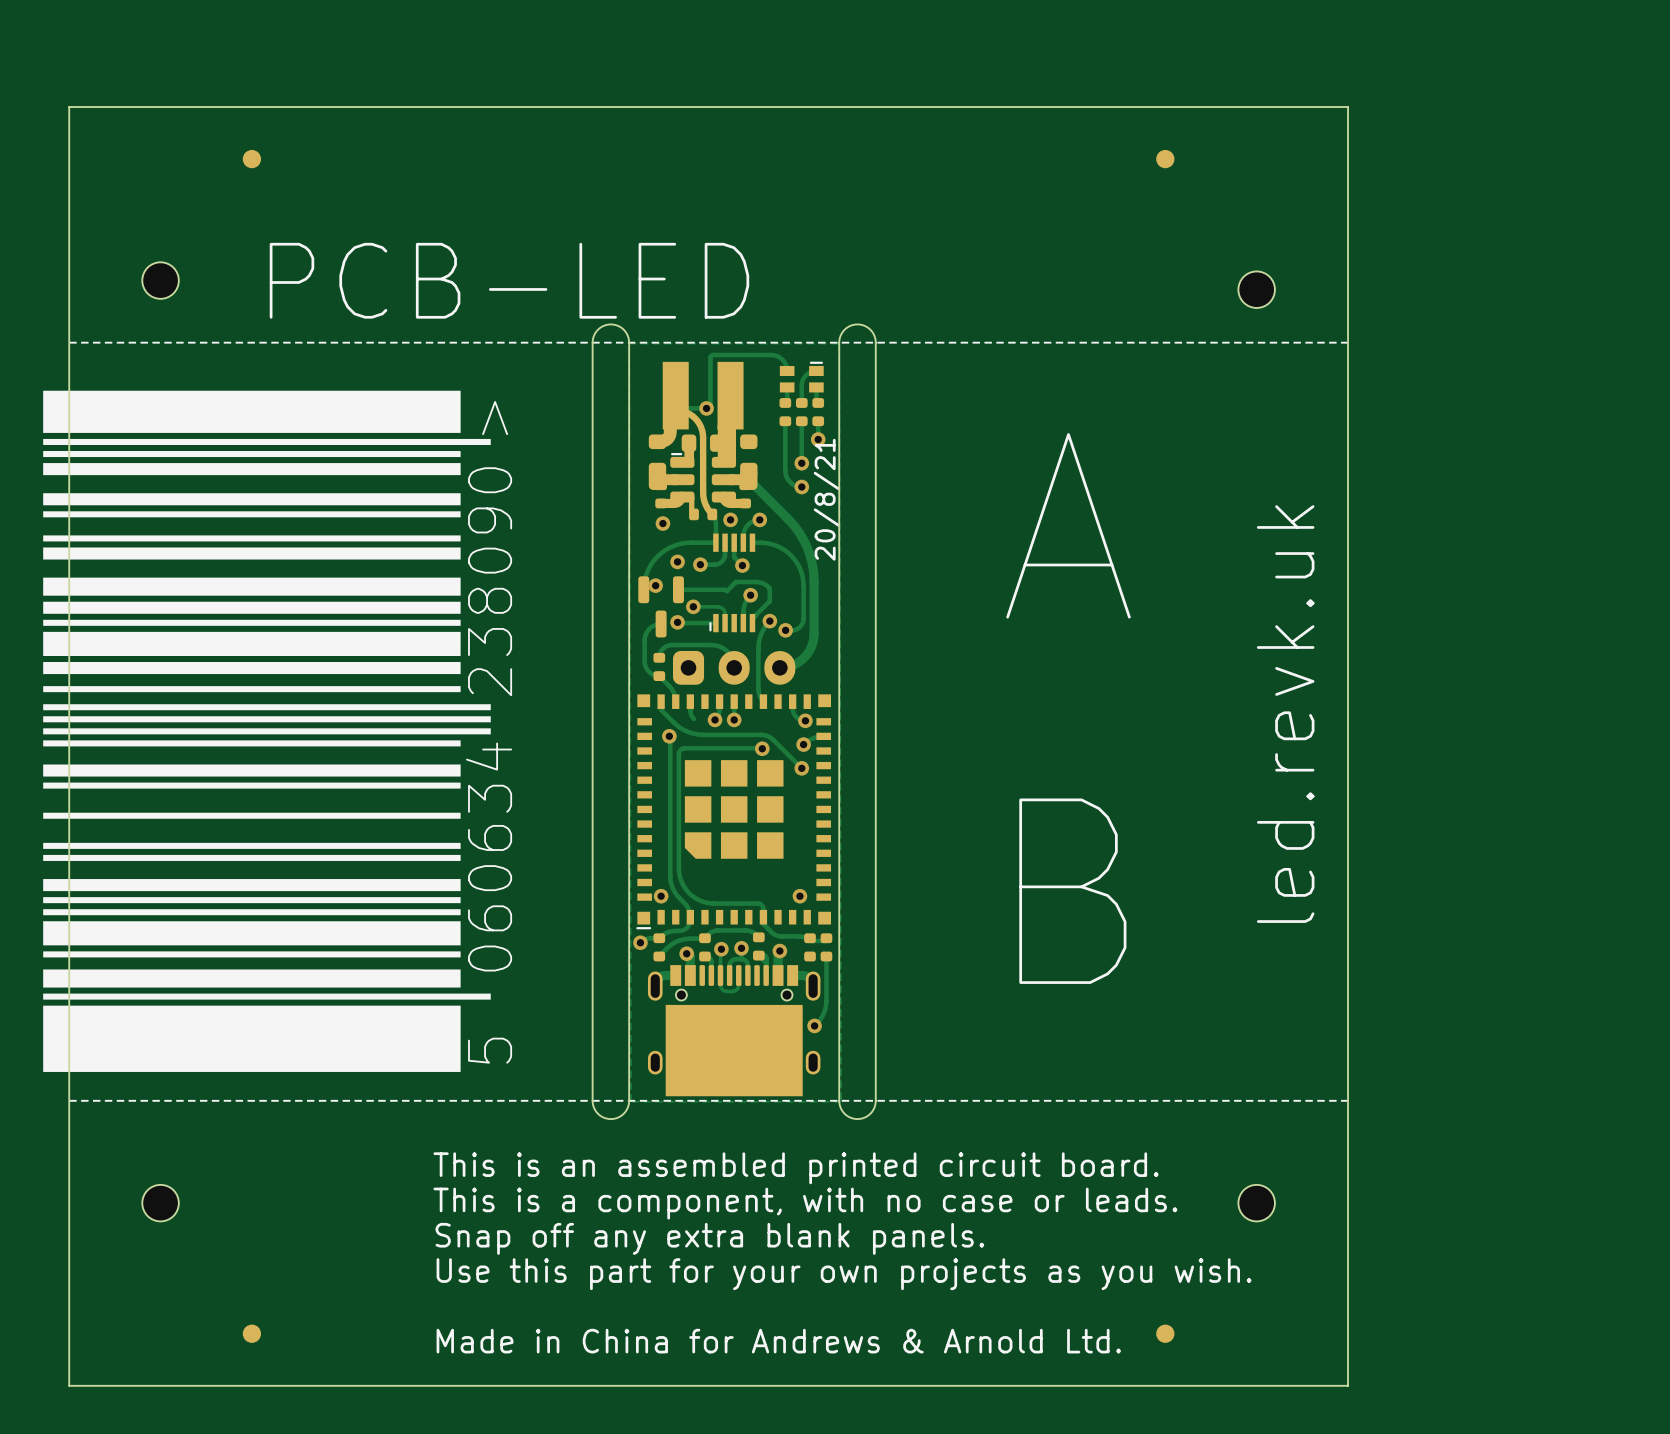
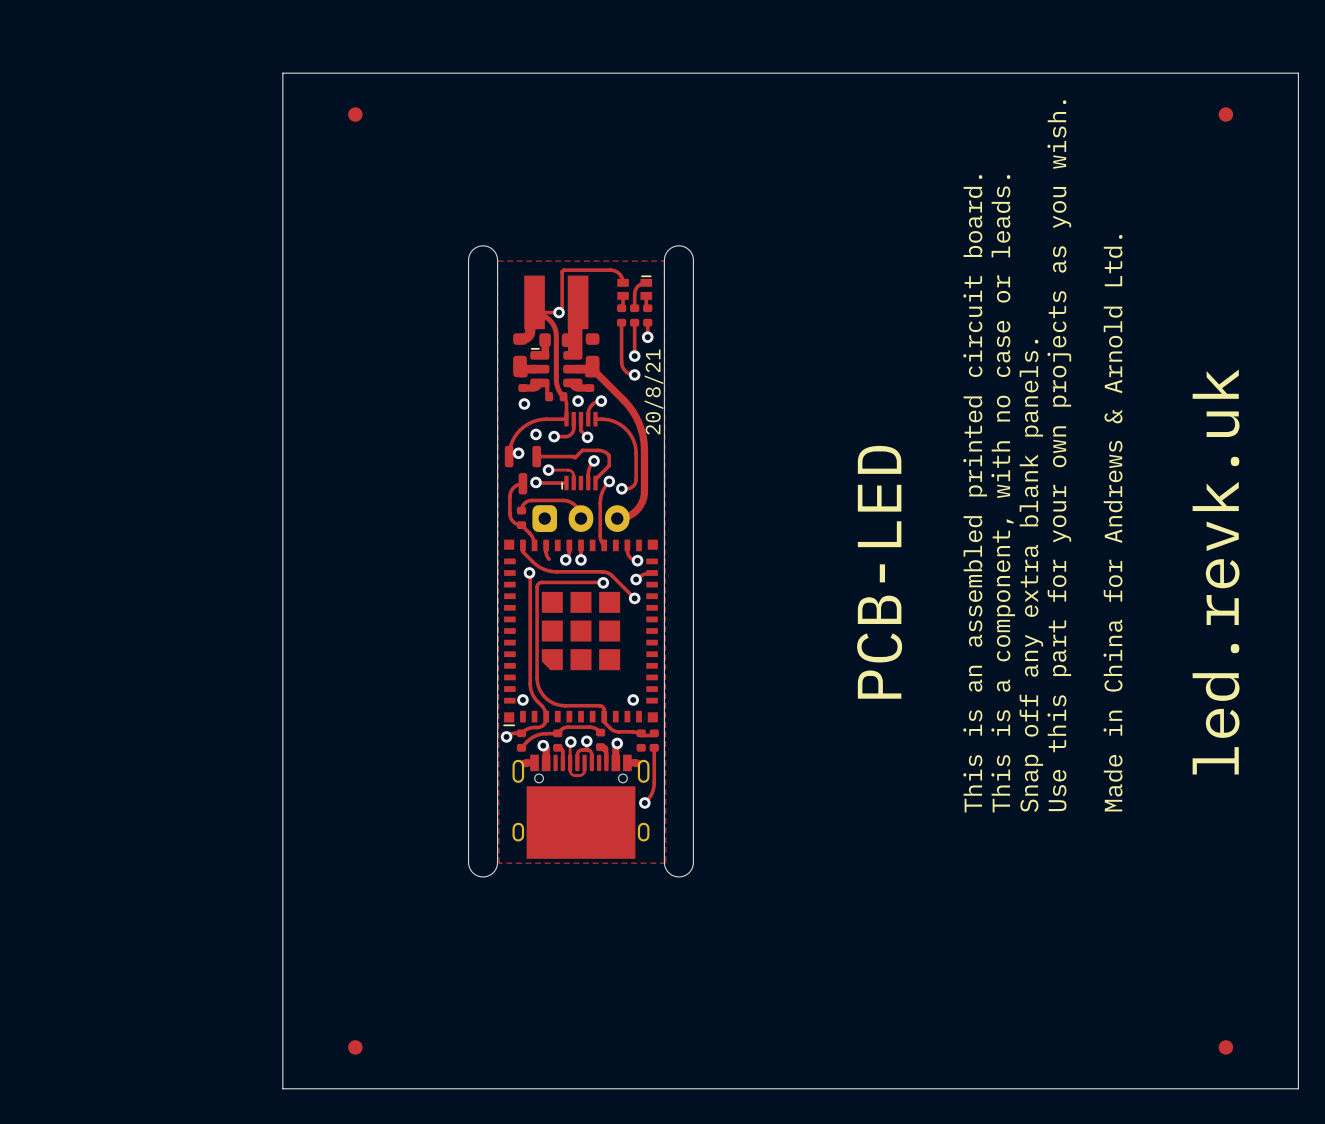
board edge: (358, 107) (69, 107) (69, 1385) (358, 1385) -> (282, 73) (282, 1088)
board edge: (1348, 107) (1348, 1385) -> (1068, 73) (1298, 73) (1298, 1088) (1068, 1088)
part position: (251, 159) -> (355, 114)
part: (1165, 159) -> none
part: none -> (1225, 114)
part: (160, 280) -> none
text: PCB-LED (509, 280) -> none
part: (1256, 289) -> none
line: (69, 342) (1348, 342) -> none
drawing: [43, 390, 491, 1072] -> none
text: A (1068, 525) -> none
text: none -> Use this part for your own projects as you wish. (1059, 455)
text: none -> This is a component, with no case or leads. (1003, 493)
text: none -> This is an assembled printed circuit board. (975, 493)
text: none -> Made in China for Andrews & Arnold Ltd. (1113, 523)
text: none -> PCB-LED (879, 572)
text position: led.revk.uk (1285, 714) -> led.revk.uk (1216, 572)
text: none -> Snap off any extra blank panels. (1031, 575)
text: B (1072, 891) -> none
line: (69, 1100) (1348, 1100) -> none
text: This is an assembled printed circuit board. (796, 1168) -> none
part: (160, 1203) -> none
text: This is a component, with no case or leads. (805, 1203) -> none
part: (1256, 1203) -> none
text: Snap off any extra blank panels. (709, 1238) -> none
text: Use this part for your own projects as you wish. (844, 1274) -> none
part position: (251, 1333) -> (355, 1047)
part: (1165, 1333) -> none
part: none -> (1225, 1047)
text: Made in China for Andrews & Arnold Ltd. (778, 1341) -> none

